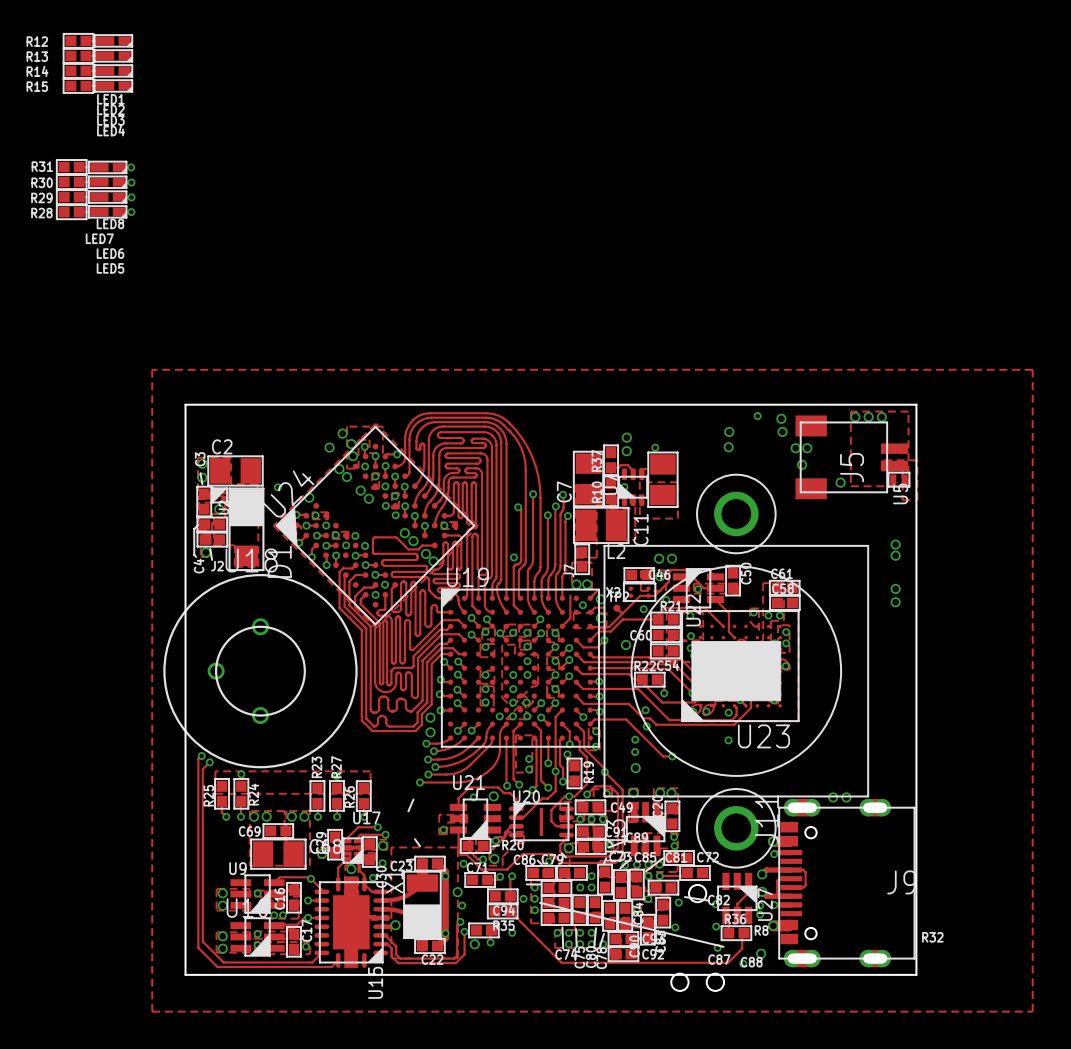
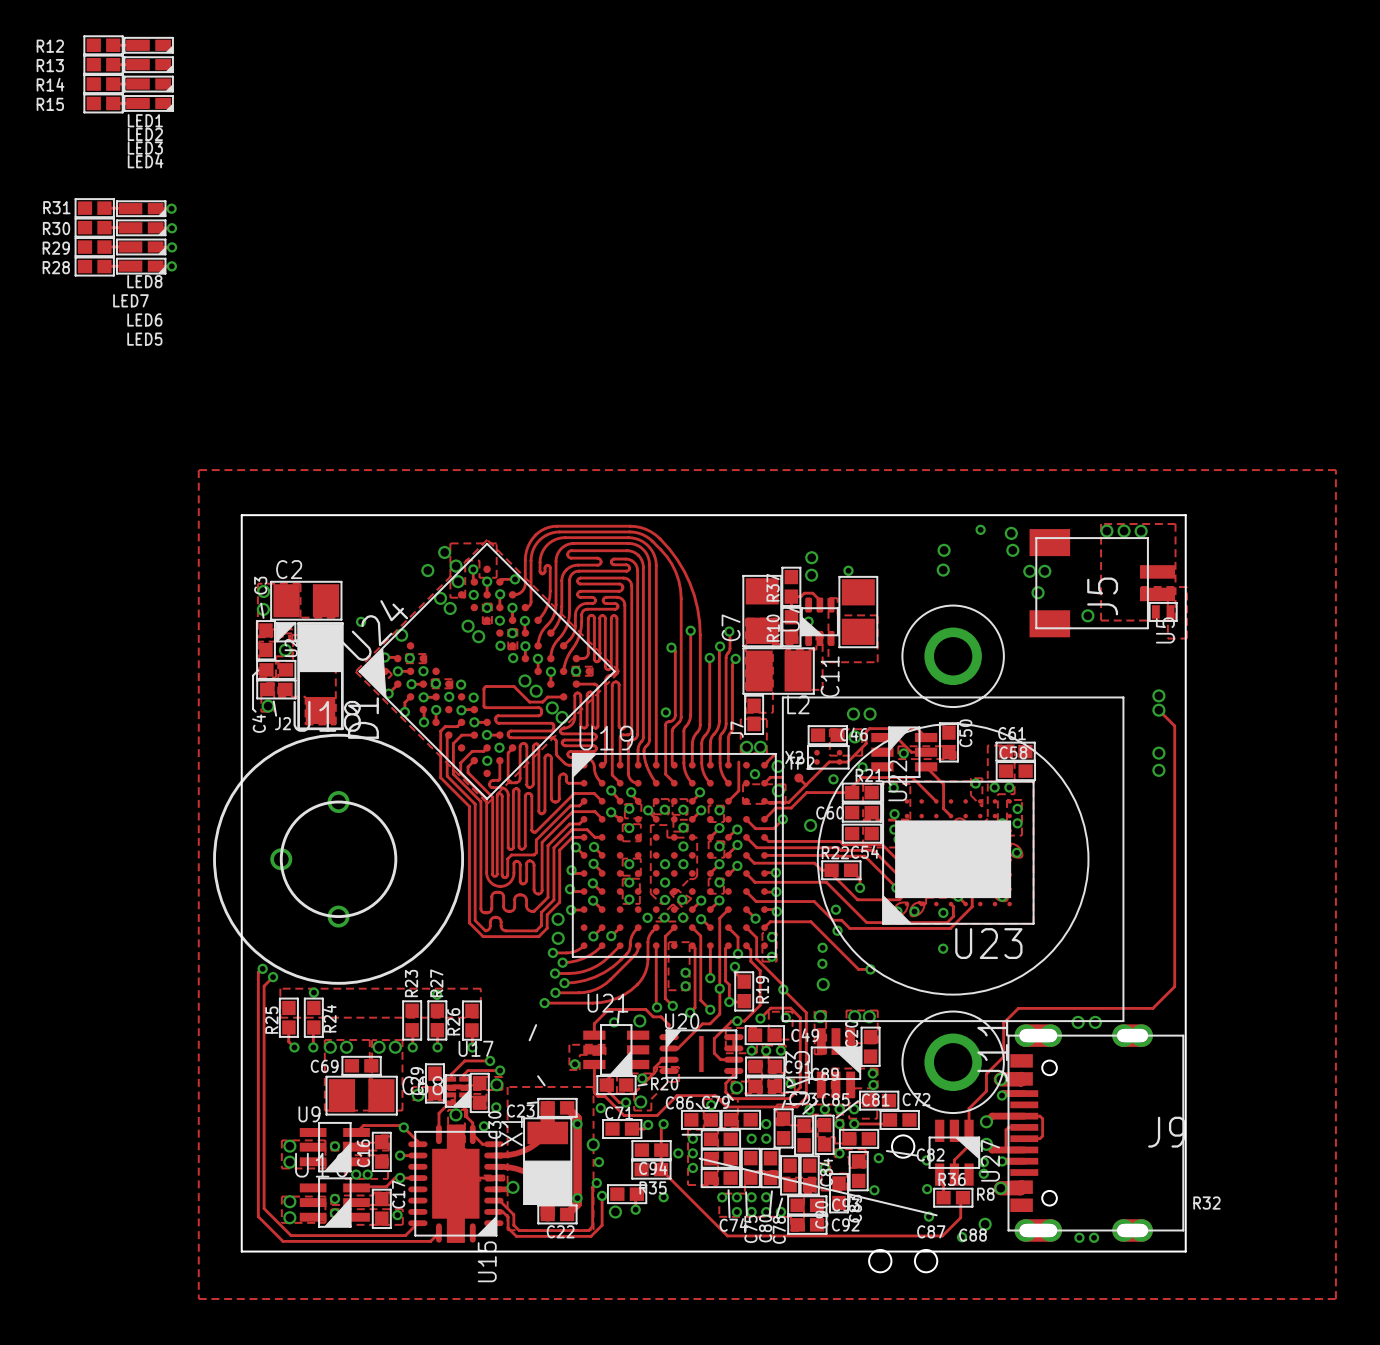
track: none -> (1158, 710) (1174, 725) (1174, 986) (1152, 1008) (1018, 1008) (1003, 1023) (1003, 1056) (986, 1073) (986, 1091) (969, 1108) (969, 1130)
via: none -> (1079, 1237)
via: none -> (1094, 1237)

